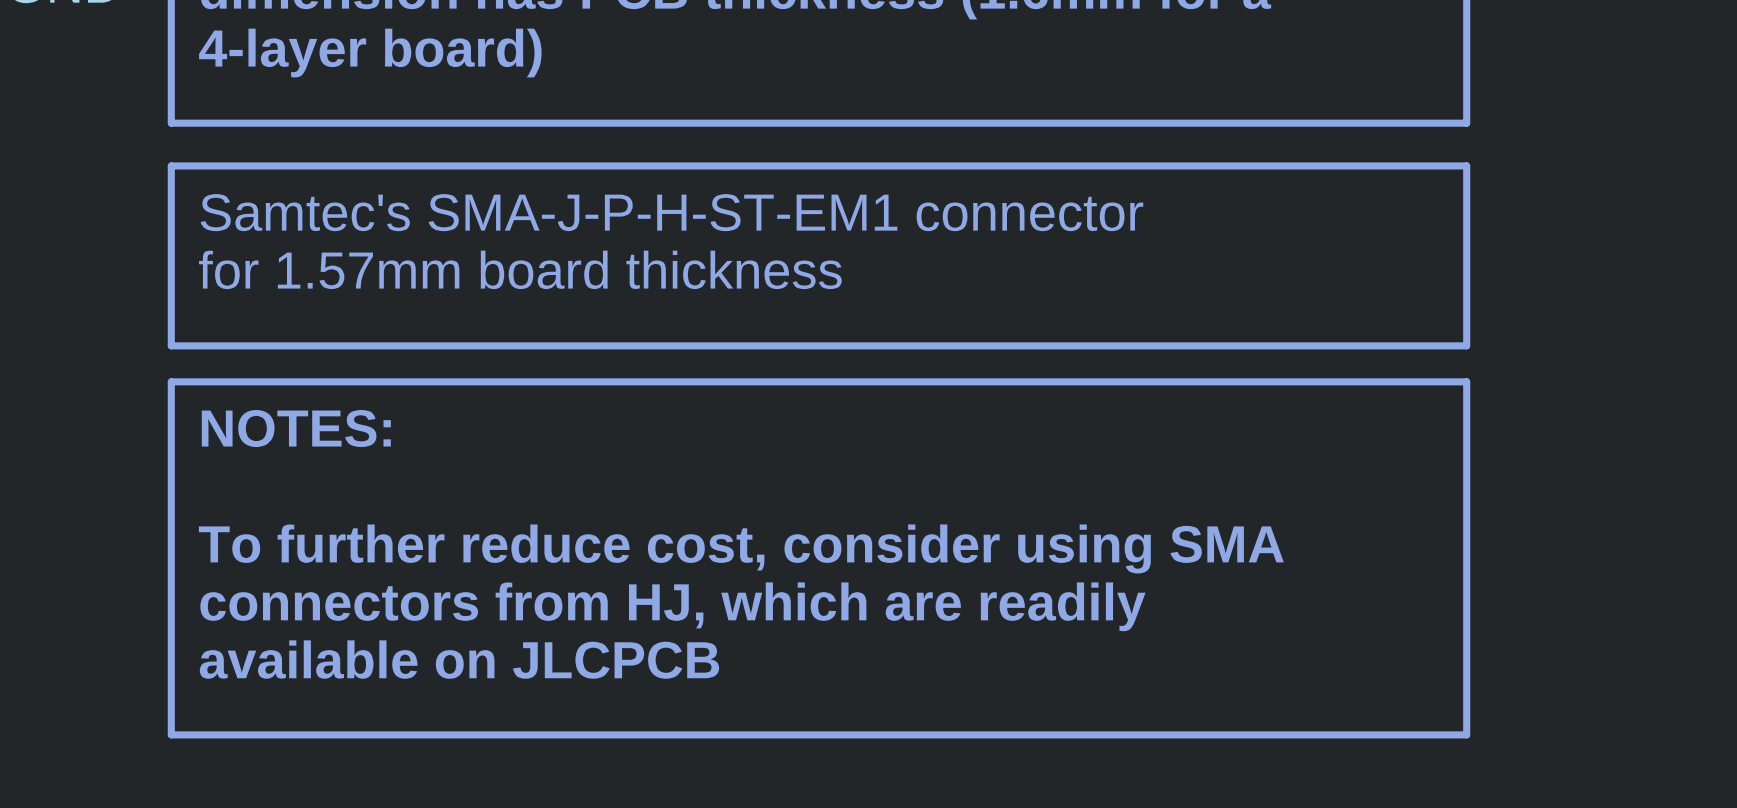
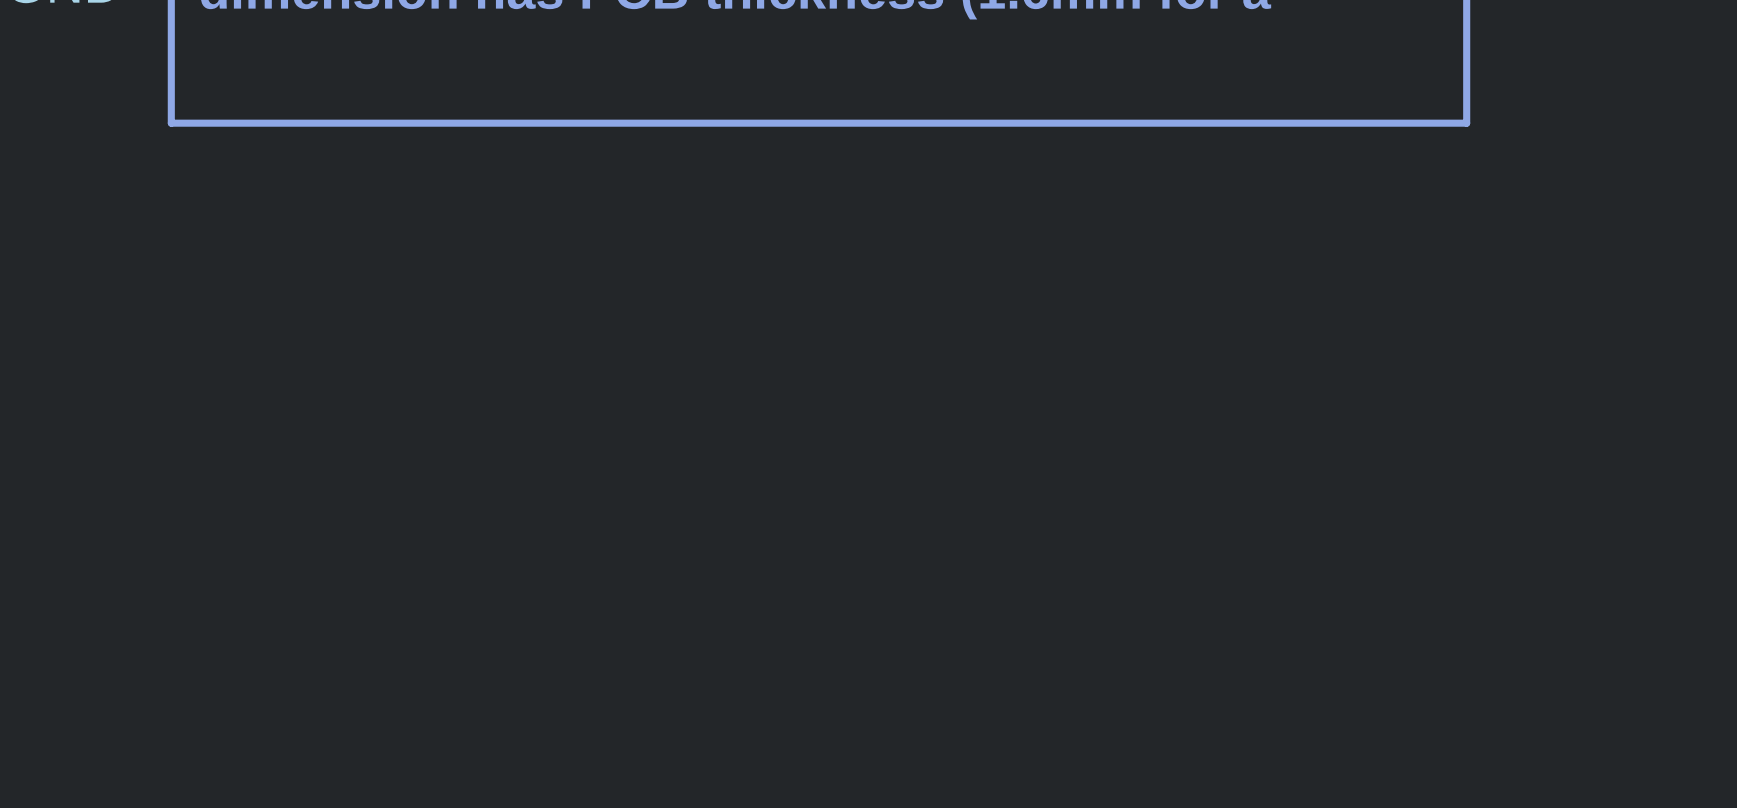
text: 4-layer board) (370, 53) -> none
line: (171, 165) (1466, 165) (1466, 345) (171, 345) (171, 165) -> none
text: Samtec's SMA-J-P-H-ST-EM1 connector (671, 212) -> none
text: for 1.57mm board thickness (520, 269) -> none
line: (171, 381) (171, 734) (1466, 734) (1466, 381) (171, 381) -> none
text: NOTES: (296, 428) -> none
text: To further reduce cost, consider using SMA (741, 548) -> none
text: connectors from HJ, which are readily (672, 606) -> none
text: available on JLCPCB (459, 659) -> none

